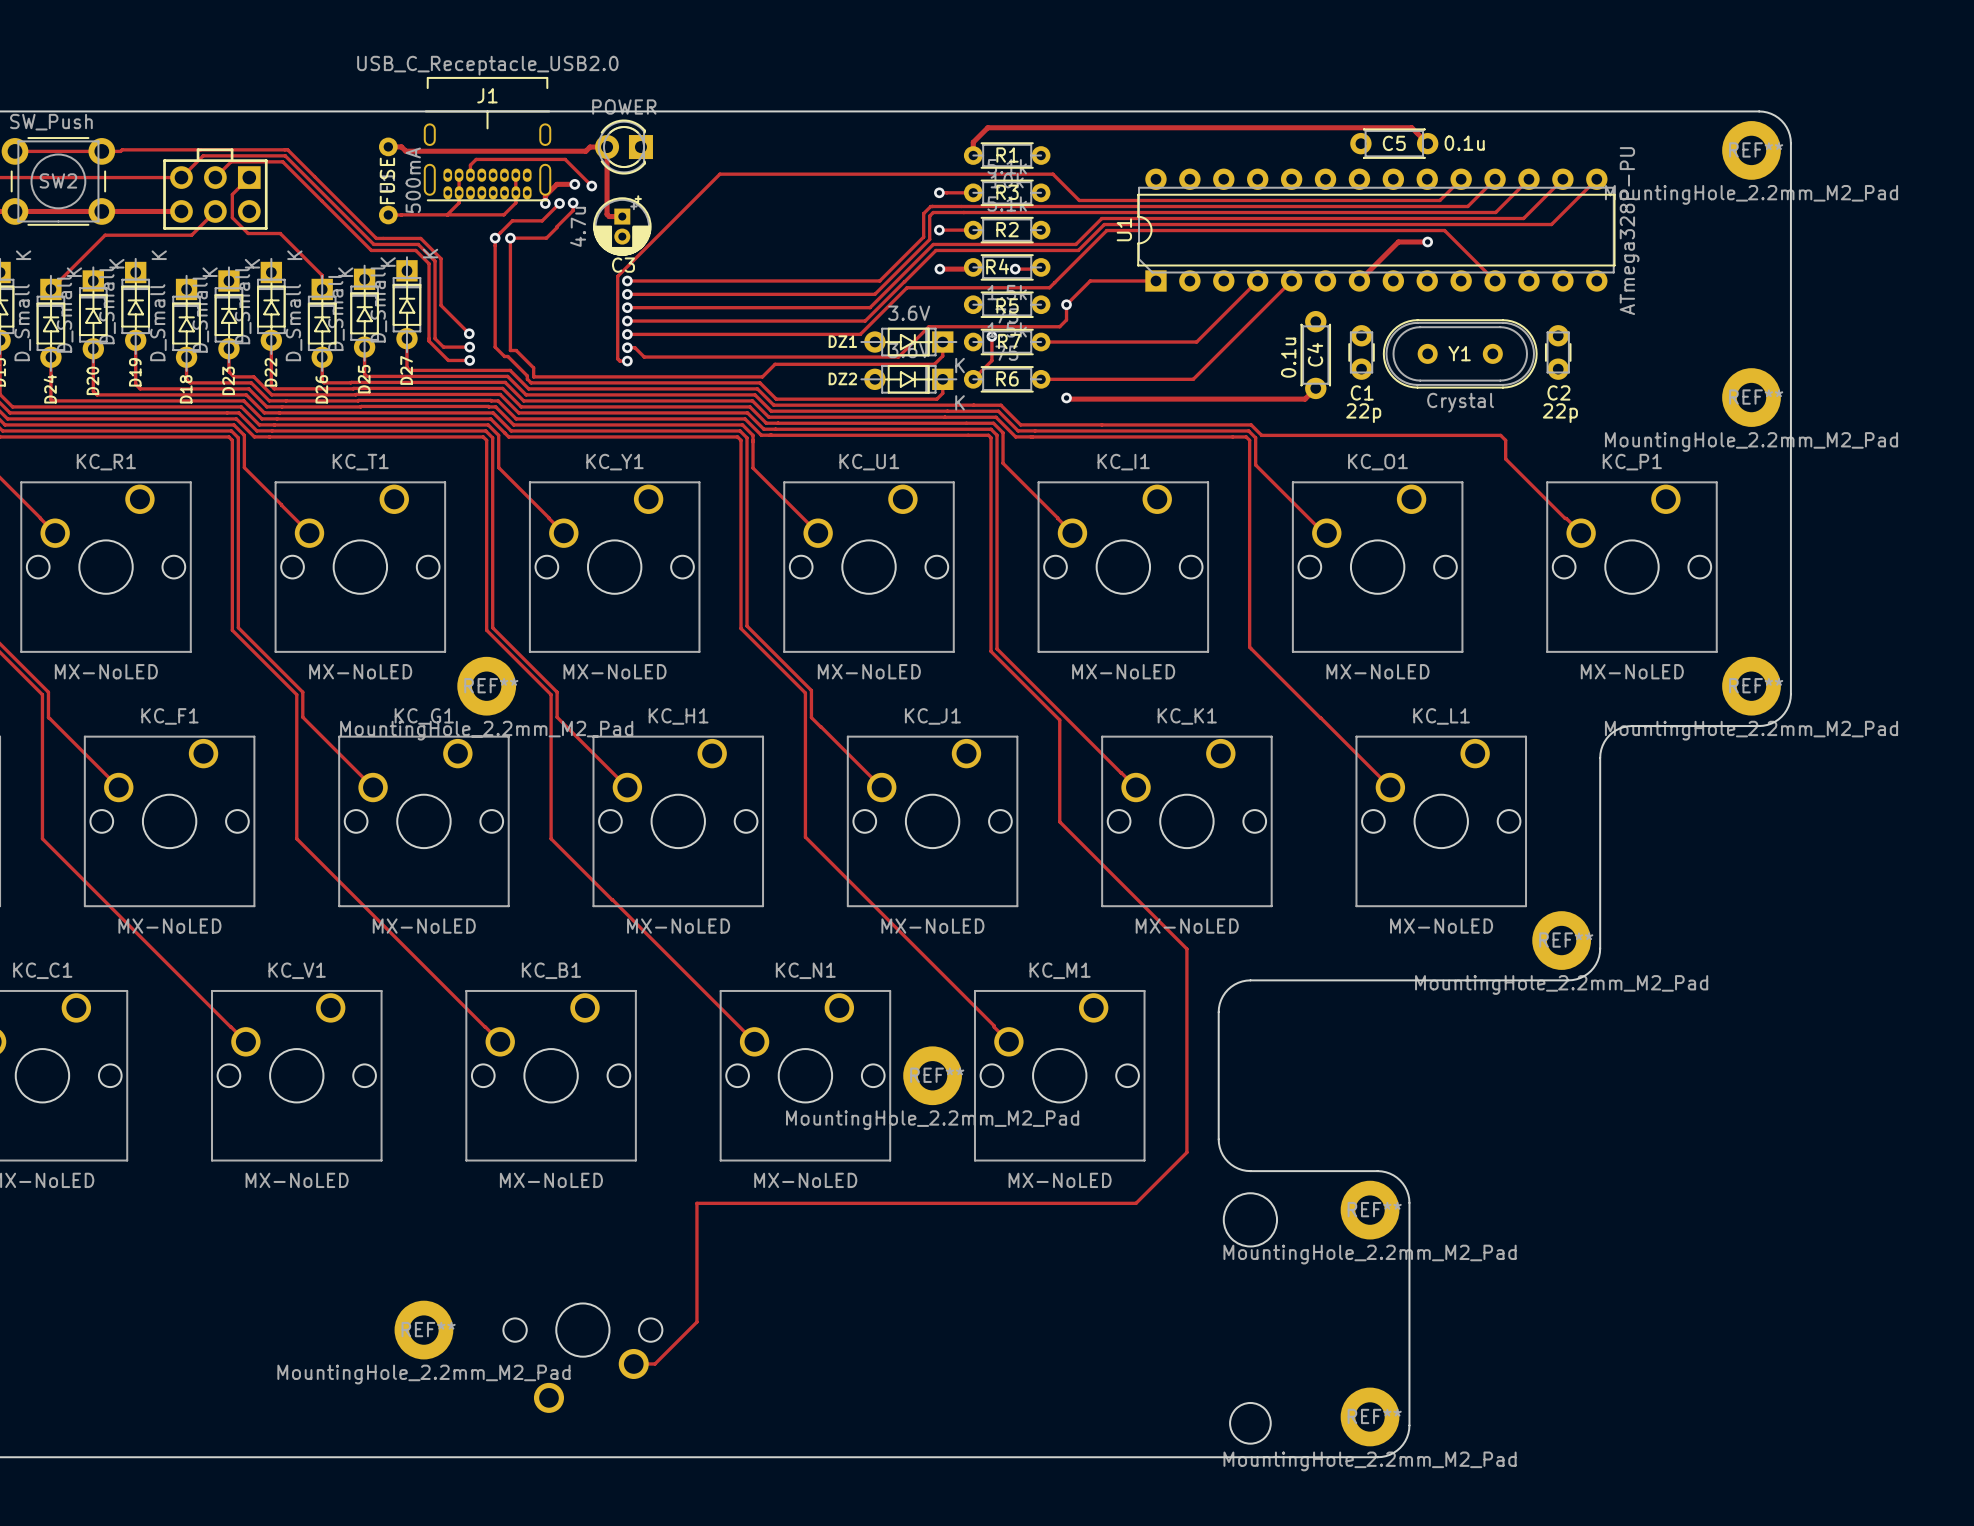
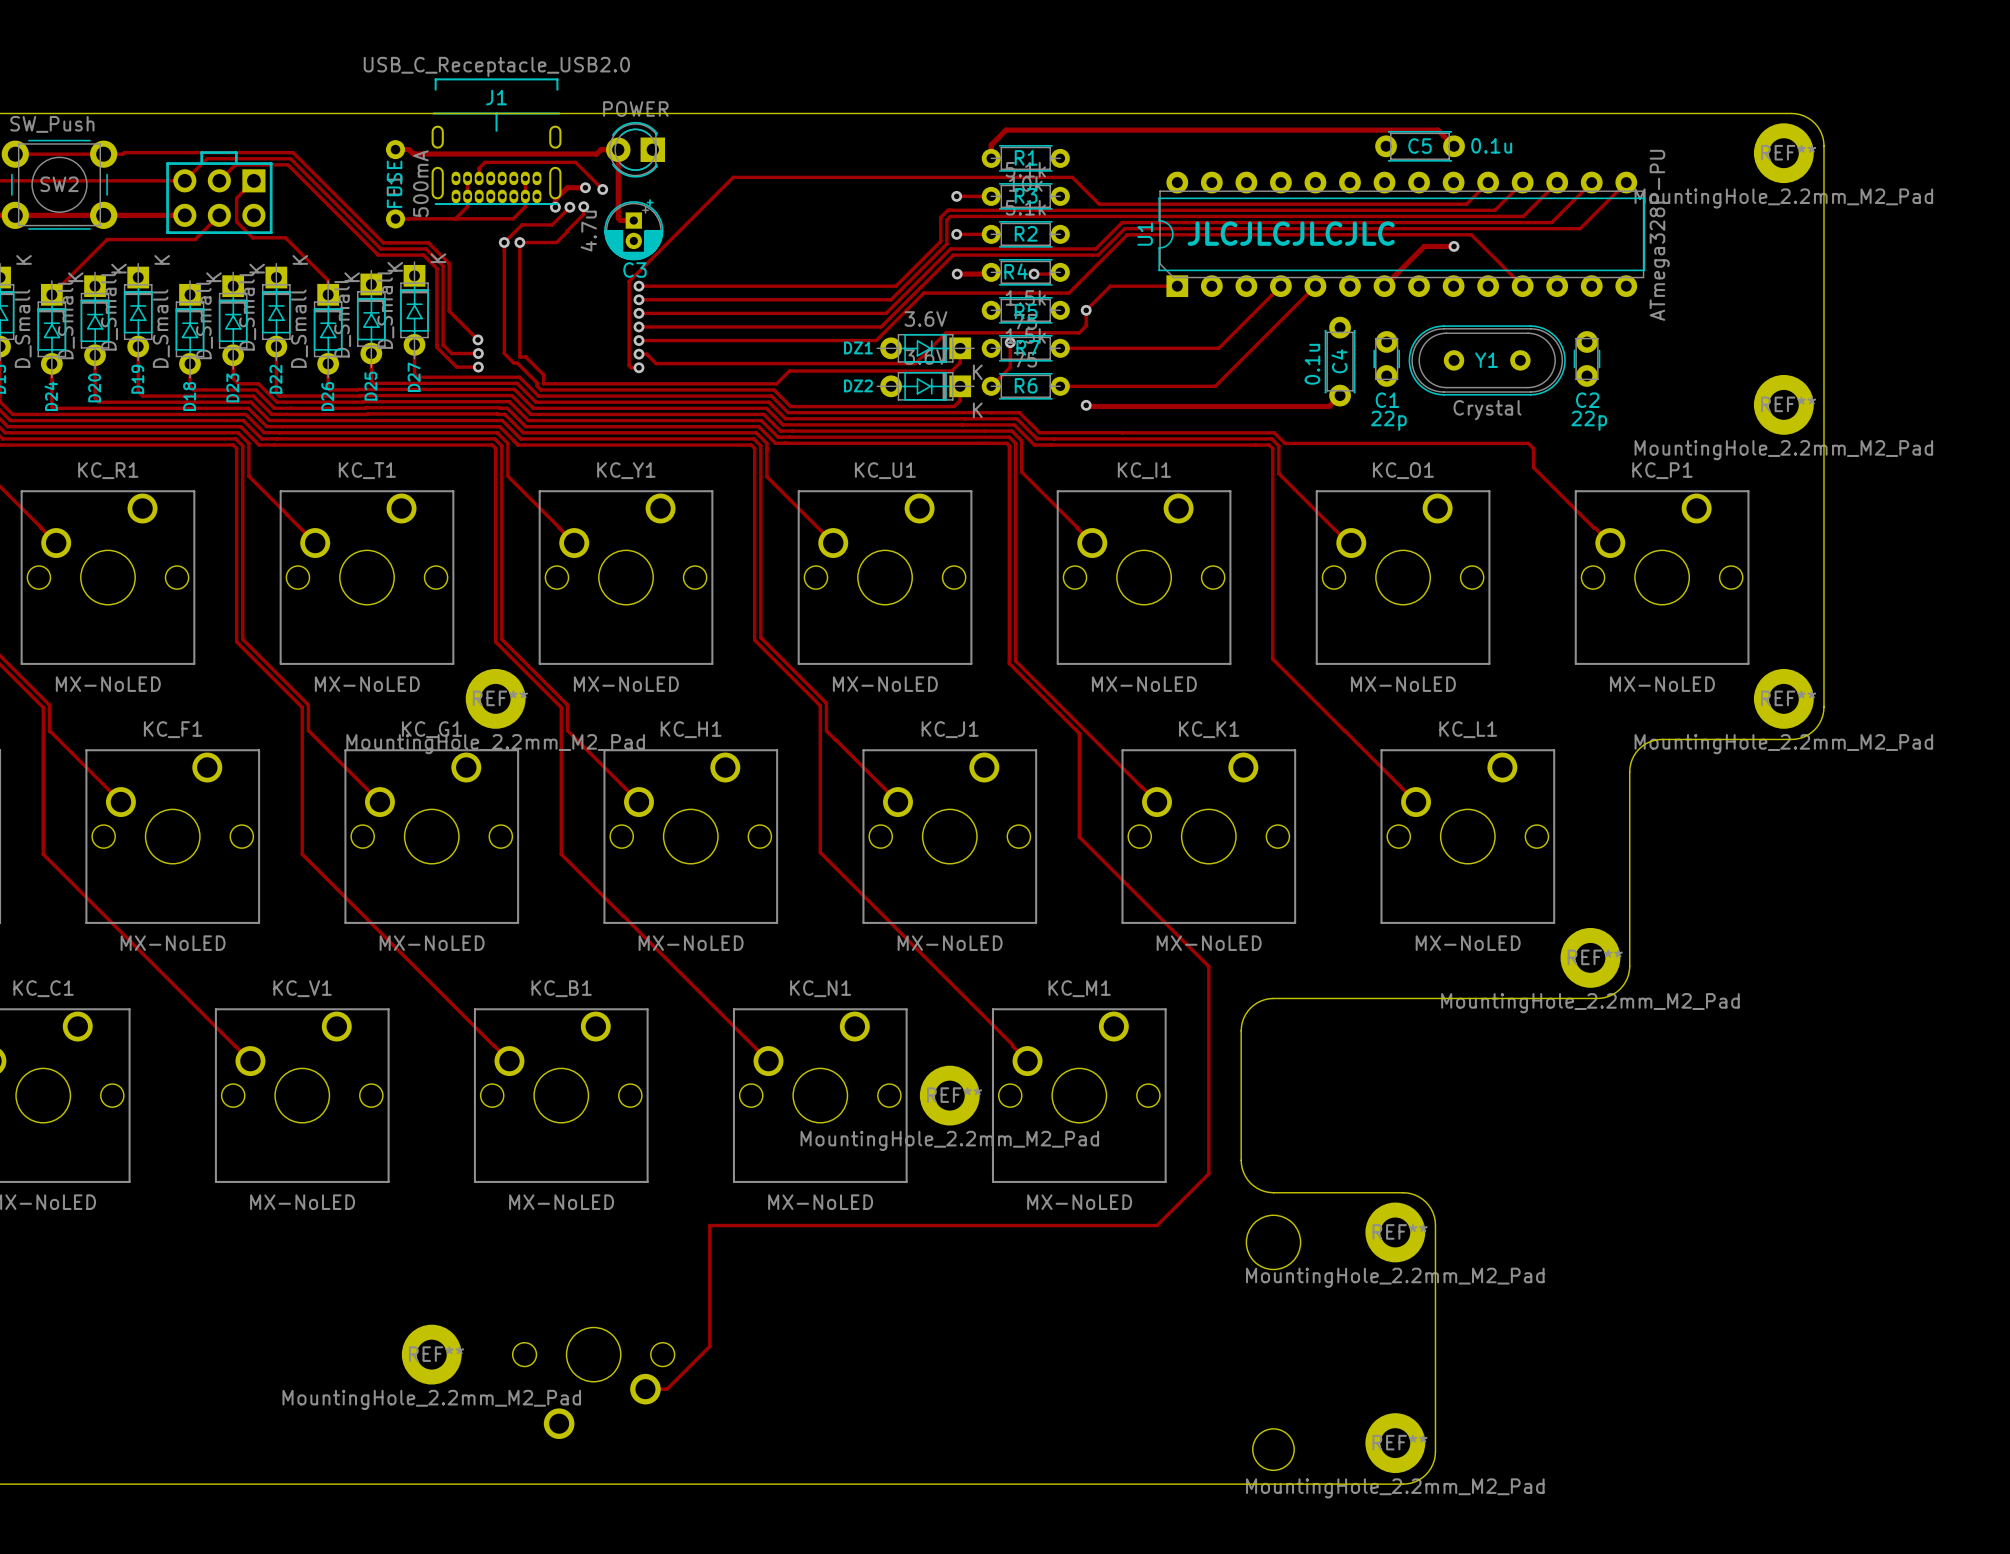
text: none -> JLCJLCJLCJLC (1291, 233)

